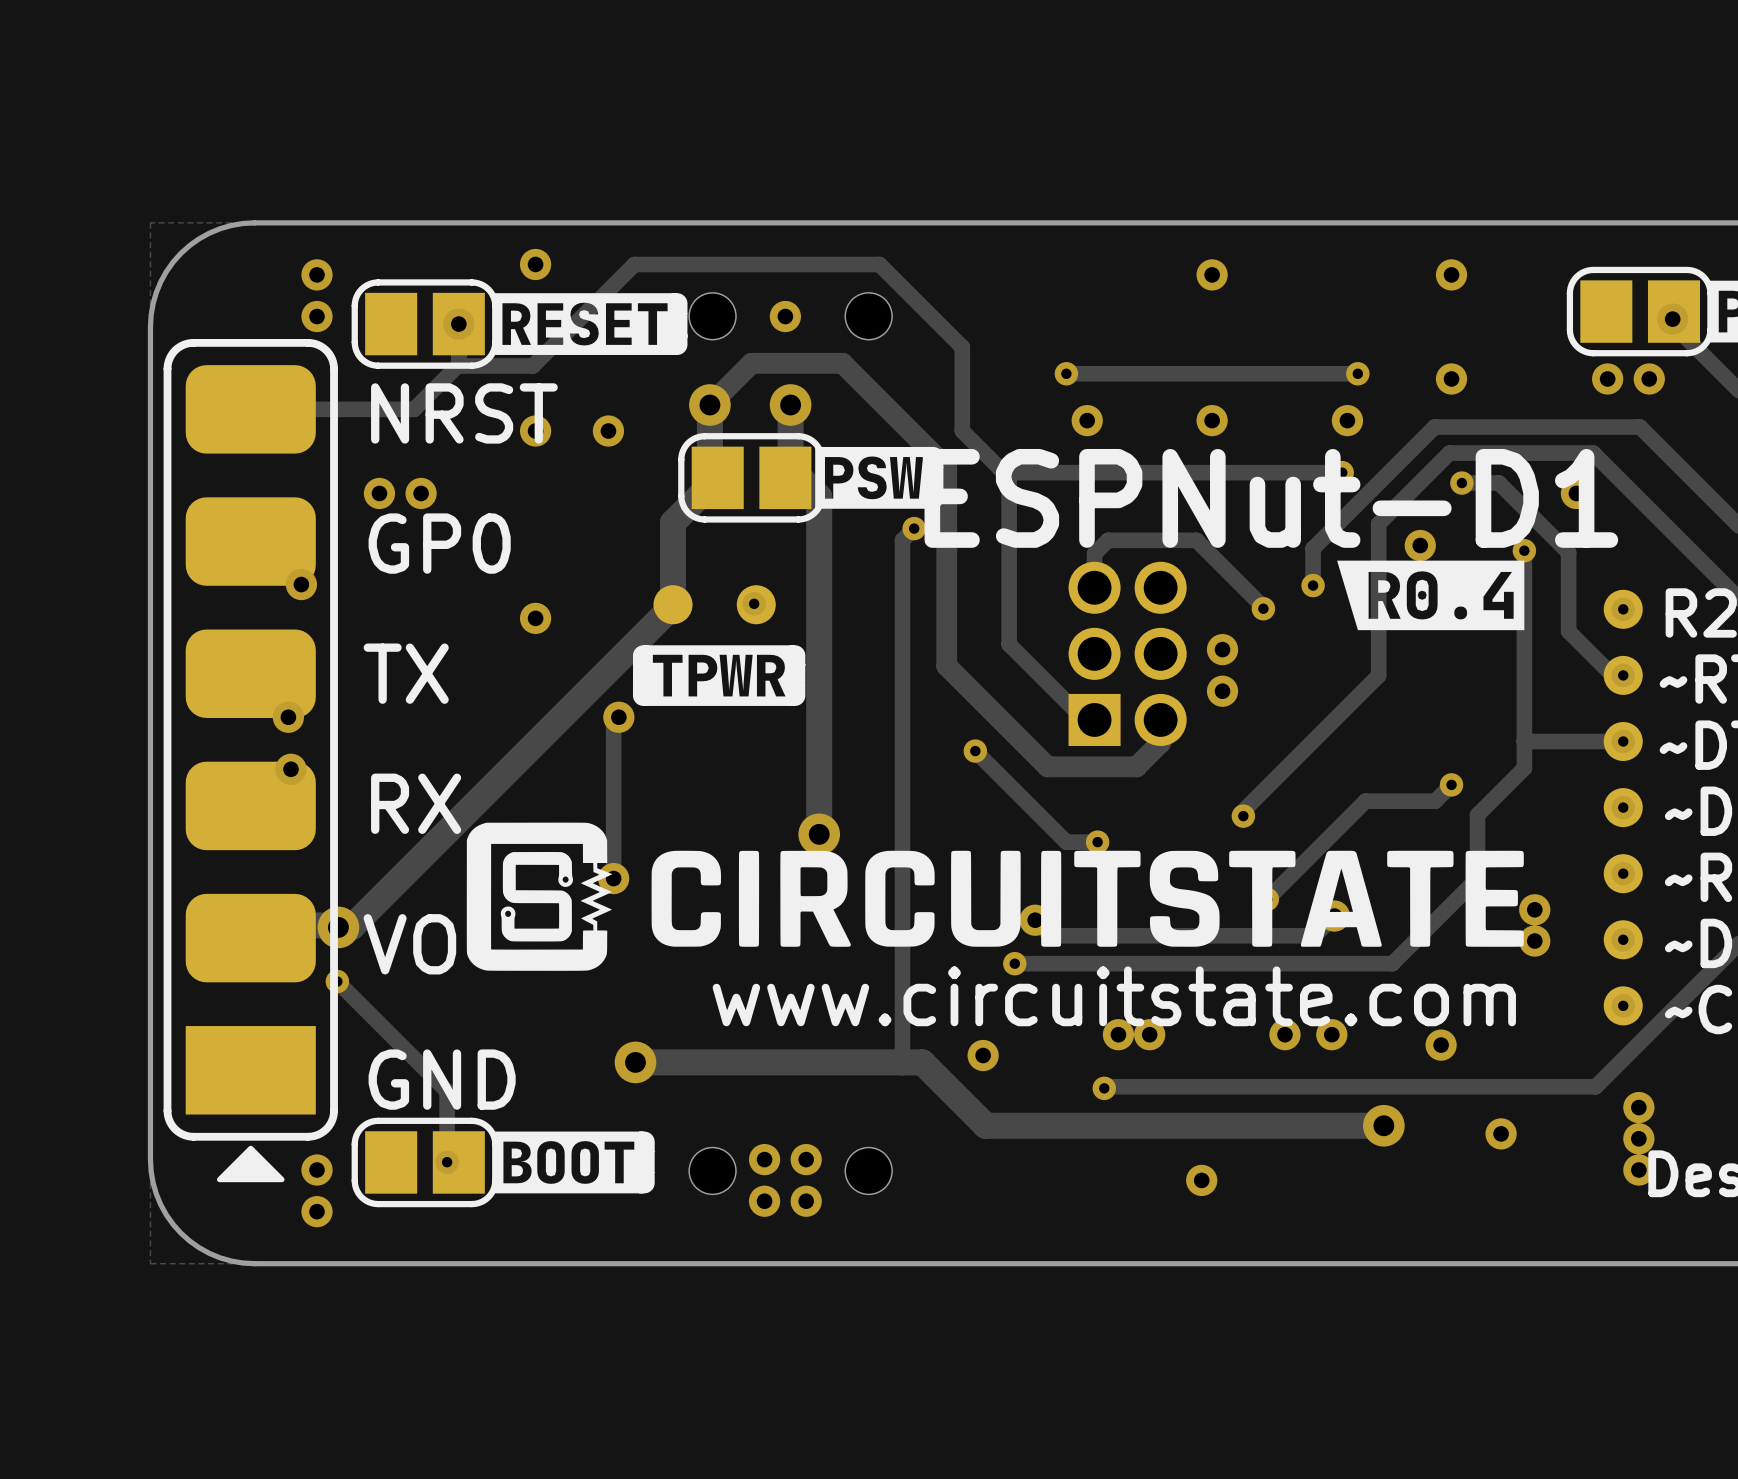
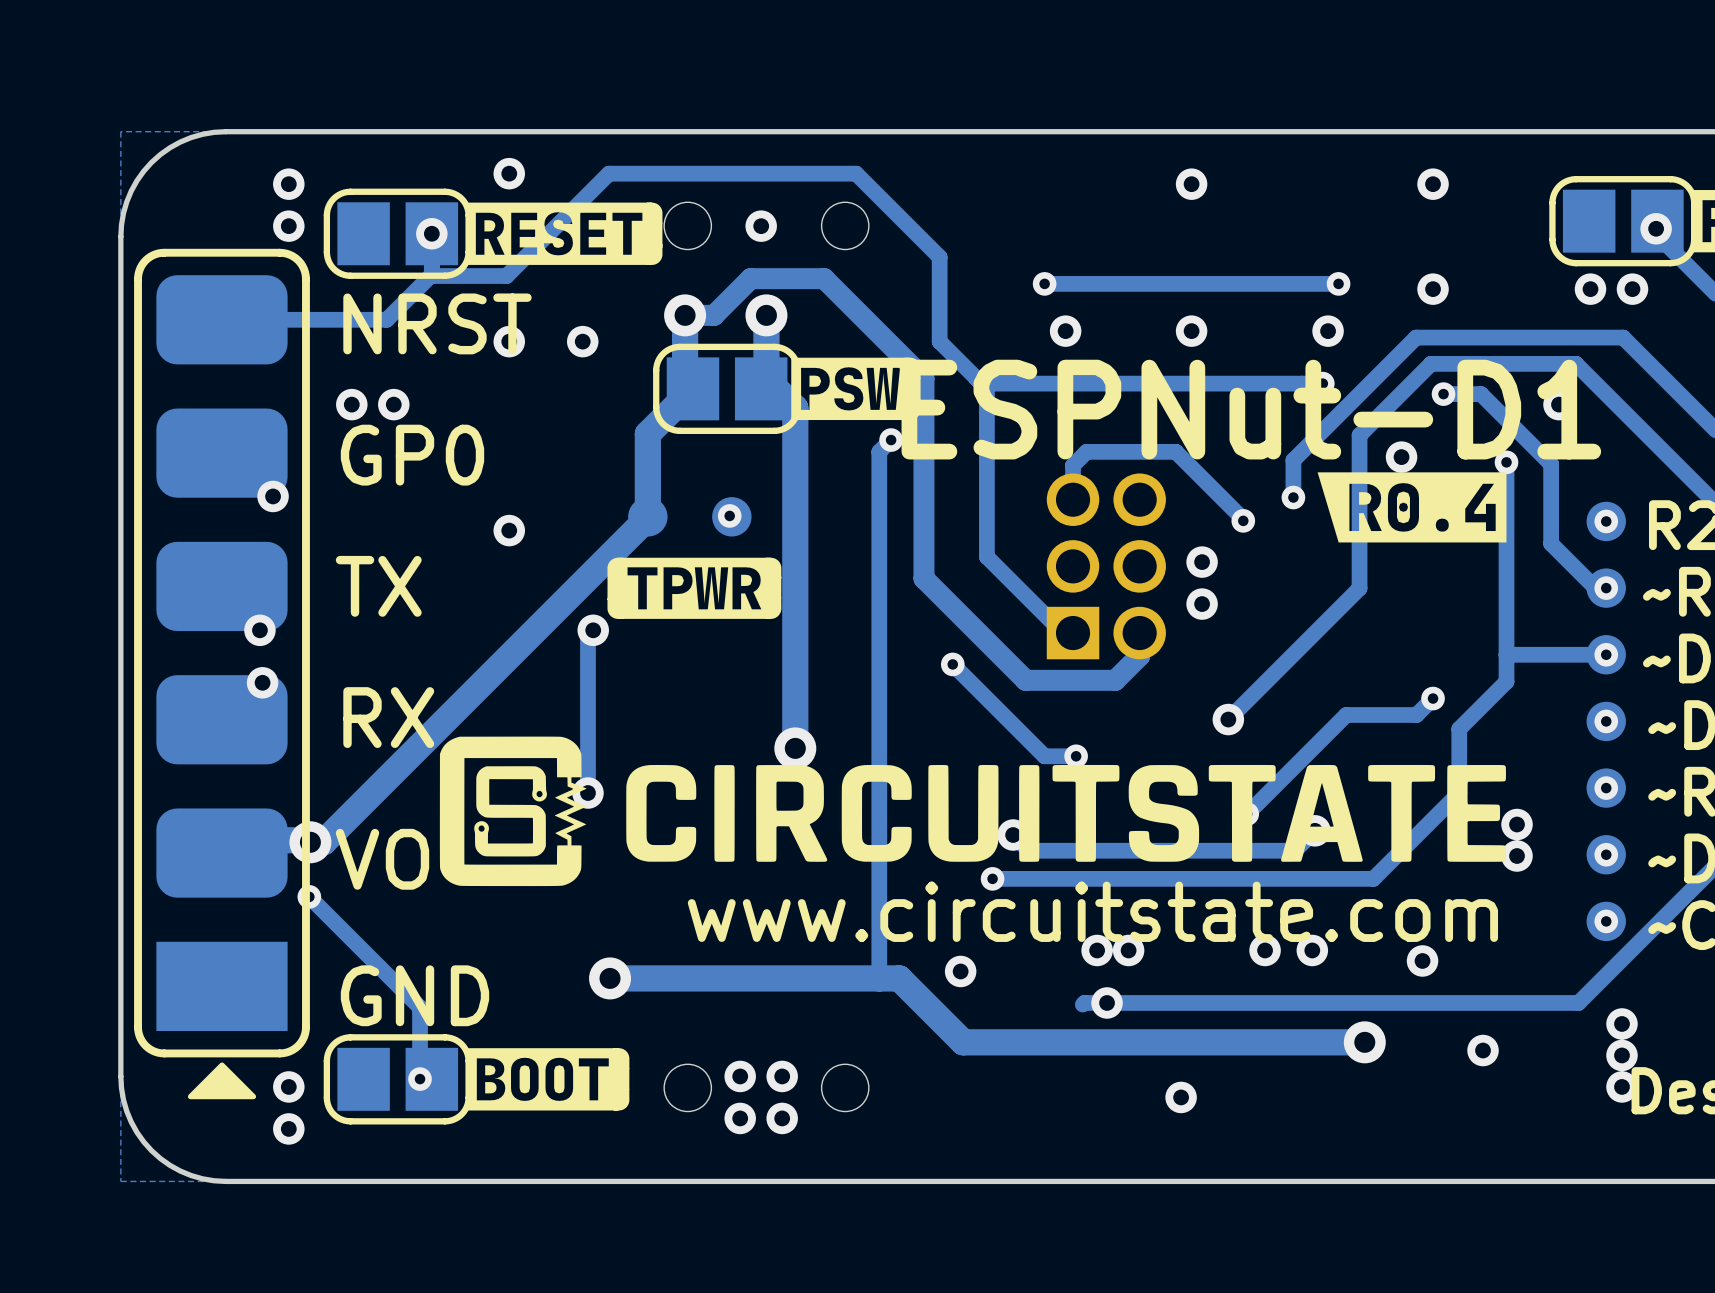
track: (847, 368) (842, 363) (751, 363) (709, 405) -> (824, 278) (750, 278) (713, 315) (685, 315)
via size: [1231, 804, 1256, 828] -> [1212, 703, 1245, 736]
via position: (1104, 1088) -> (1107, 1002)

